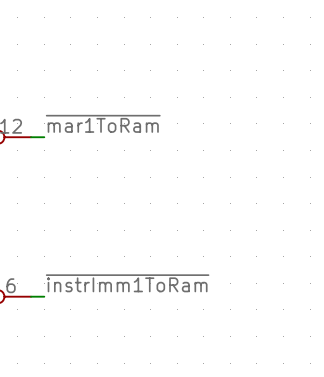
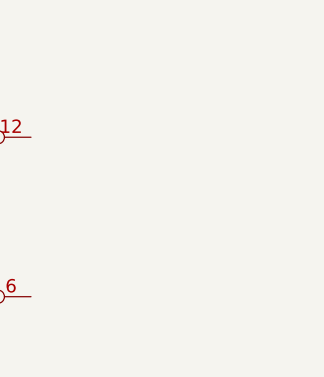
label: ~{mar1ToRam} (103, 123) -> none
wire: (31, 137) (44, 137) -> none
label: ~{instrImm1ToRam} (127, 283) -> none
wire: (31, 296) (44, 296) -> none

